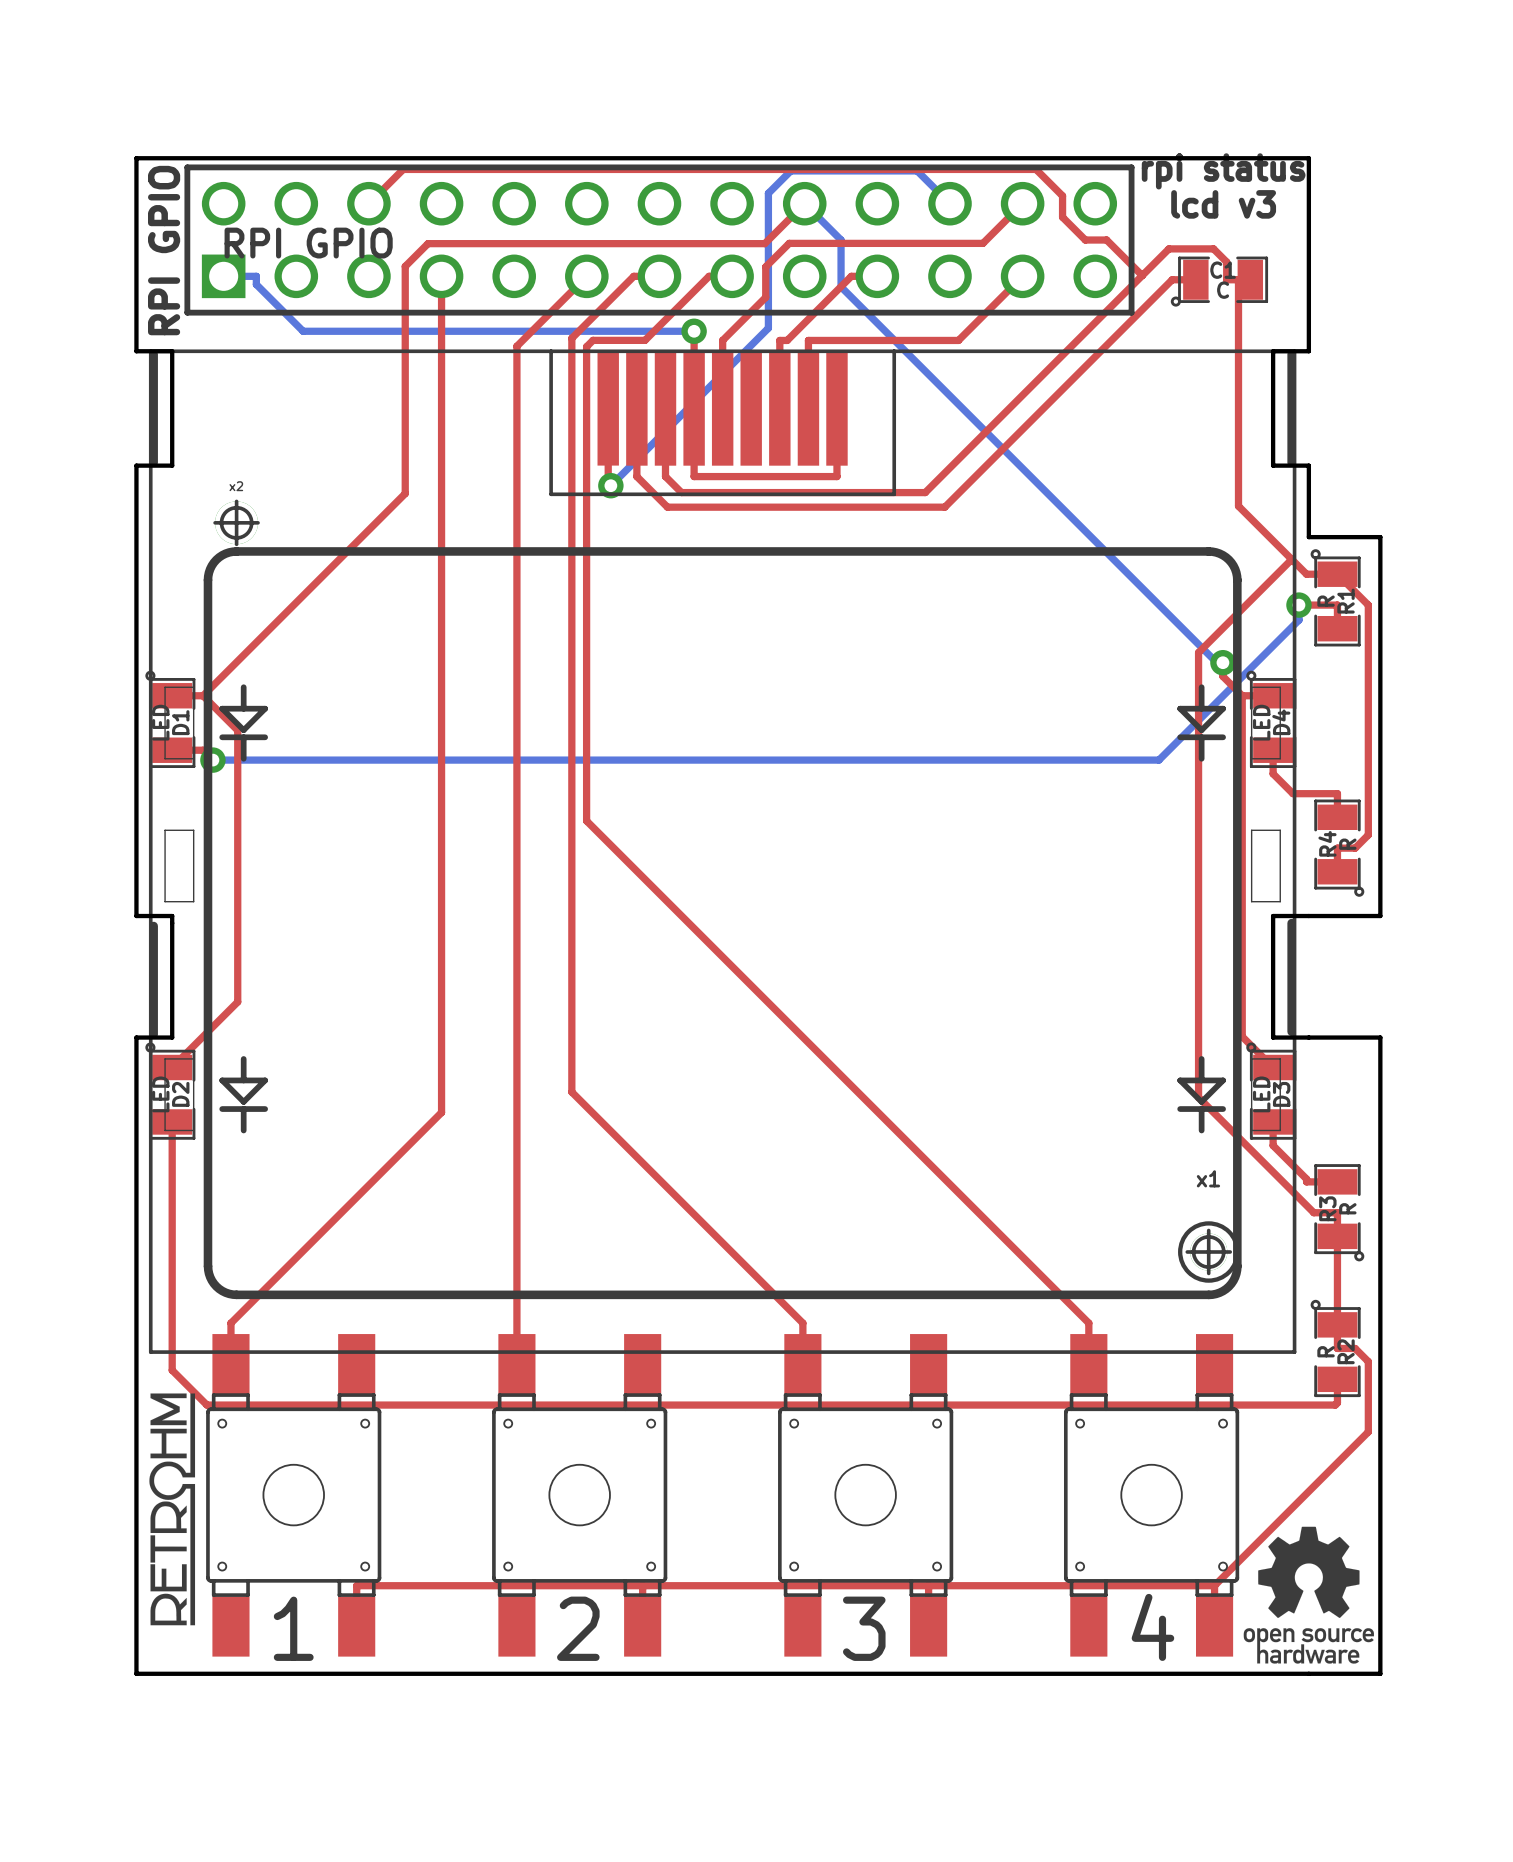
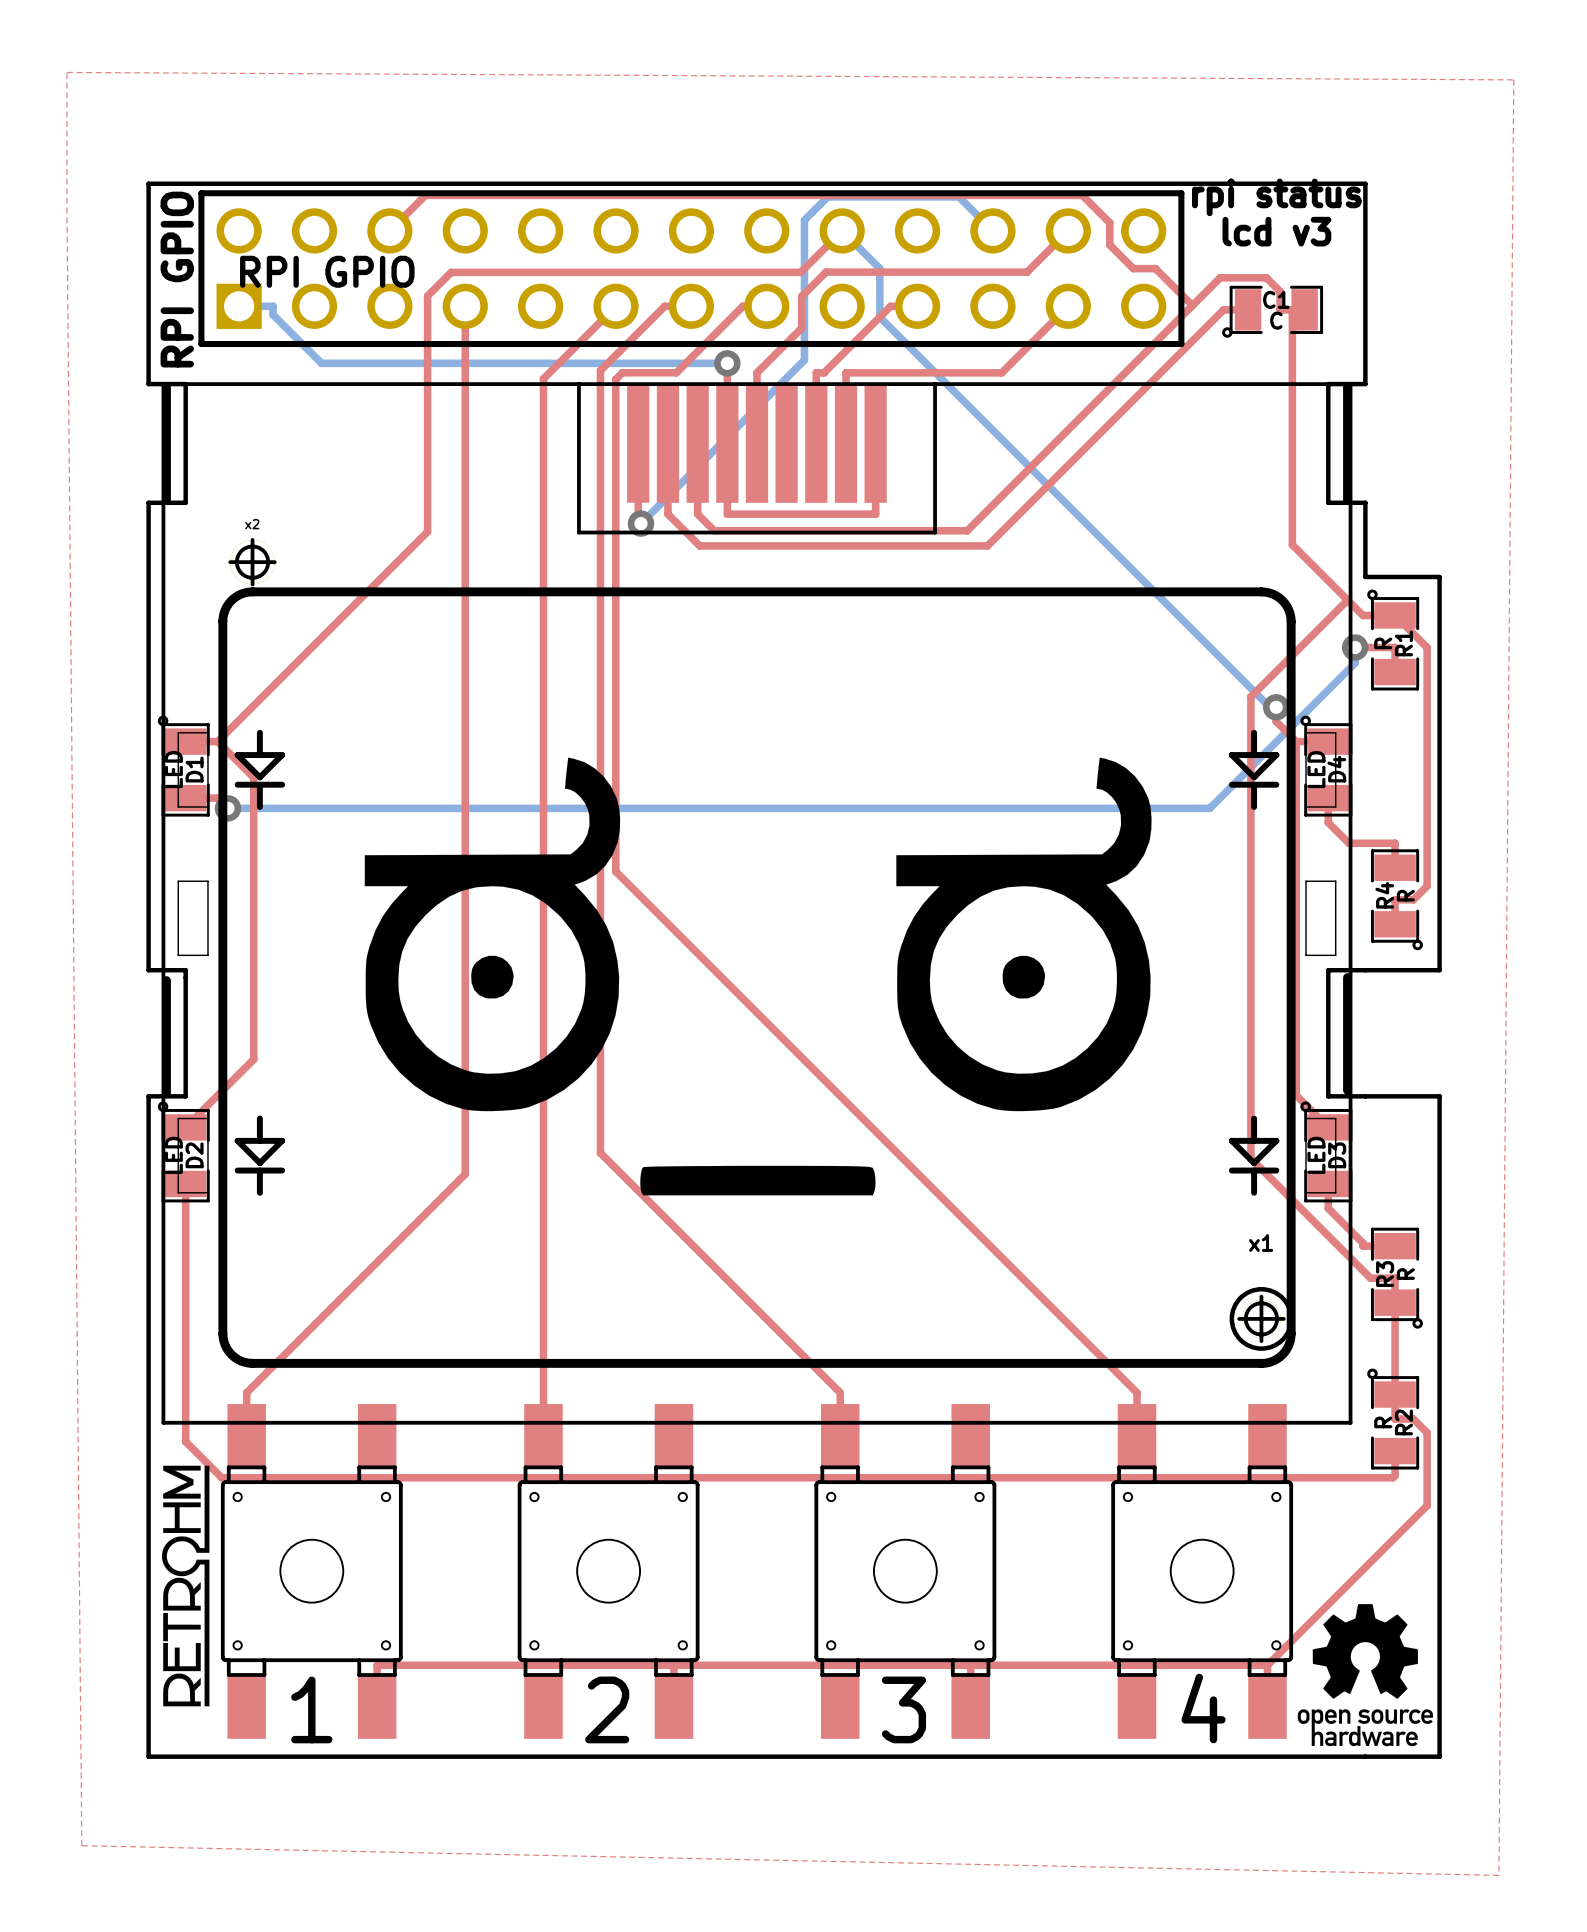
top zone outline: none -> (66, 72) (1513, 79) (1498, 1875) (81, 1845) (66, 72)
drawing: none -> [364, 757, 1152, 1196]

